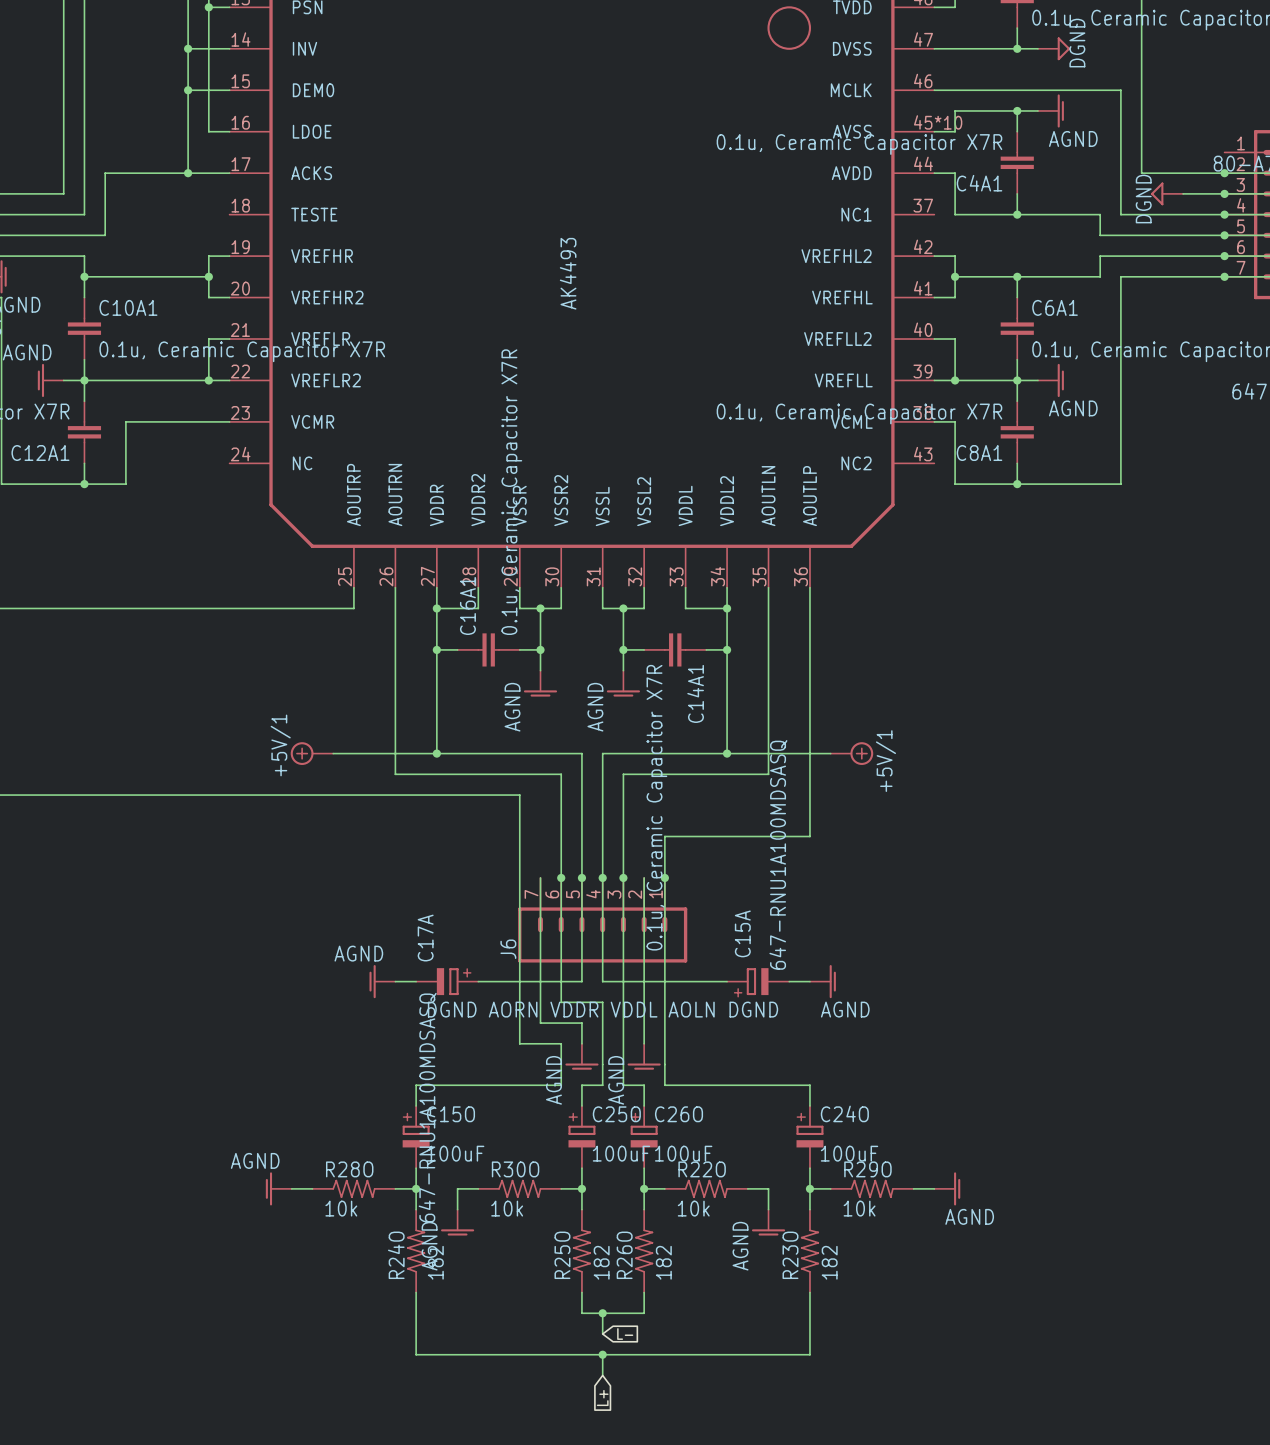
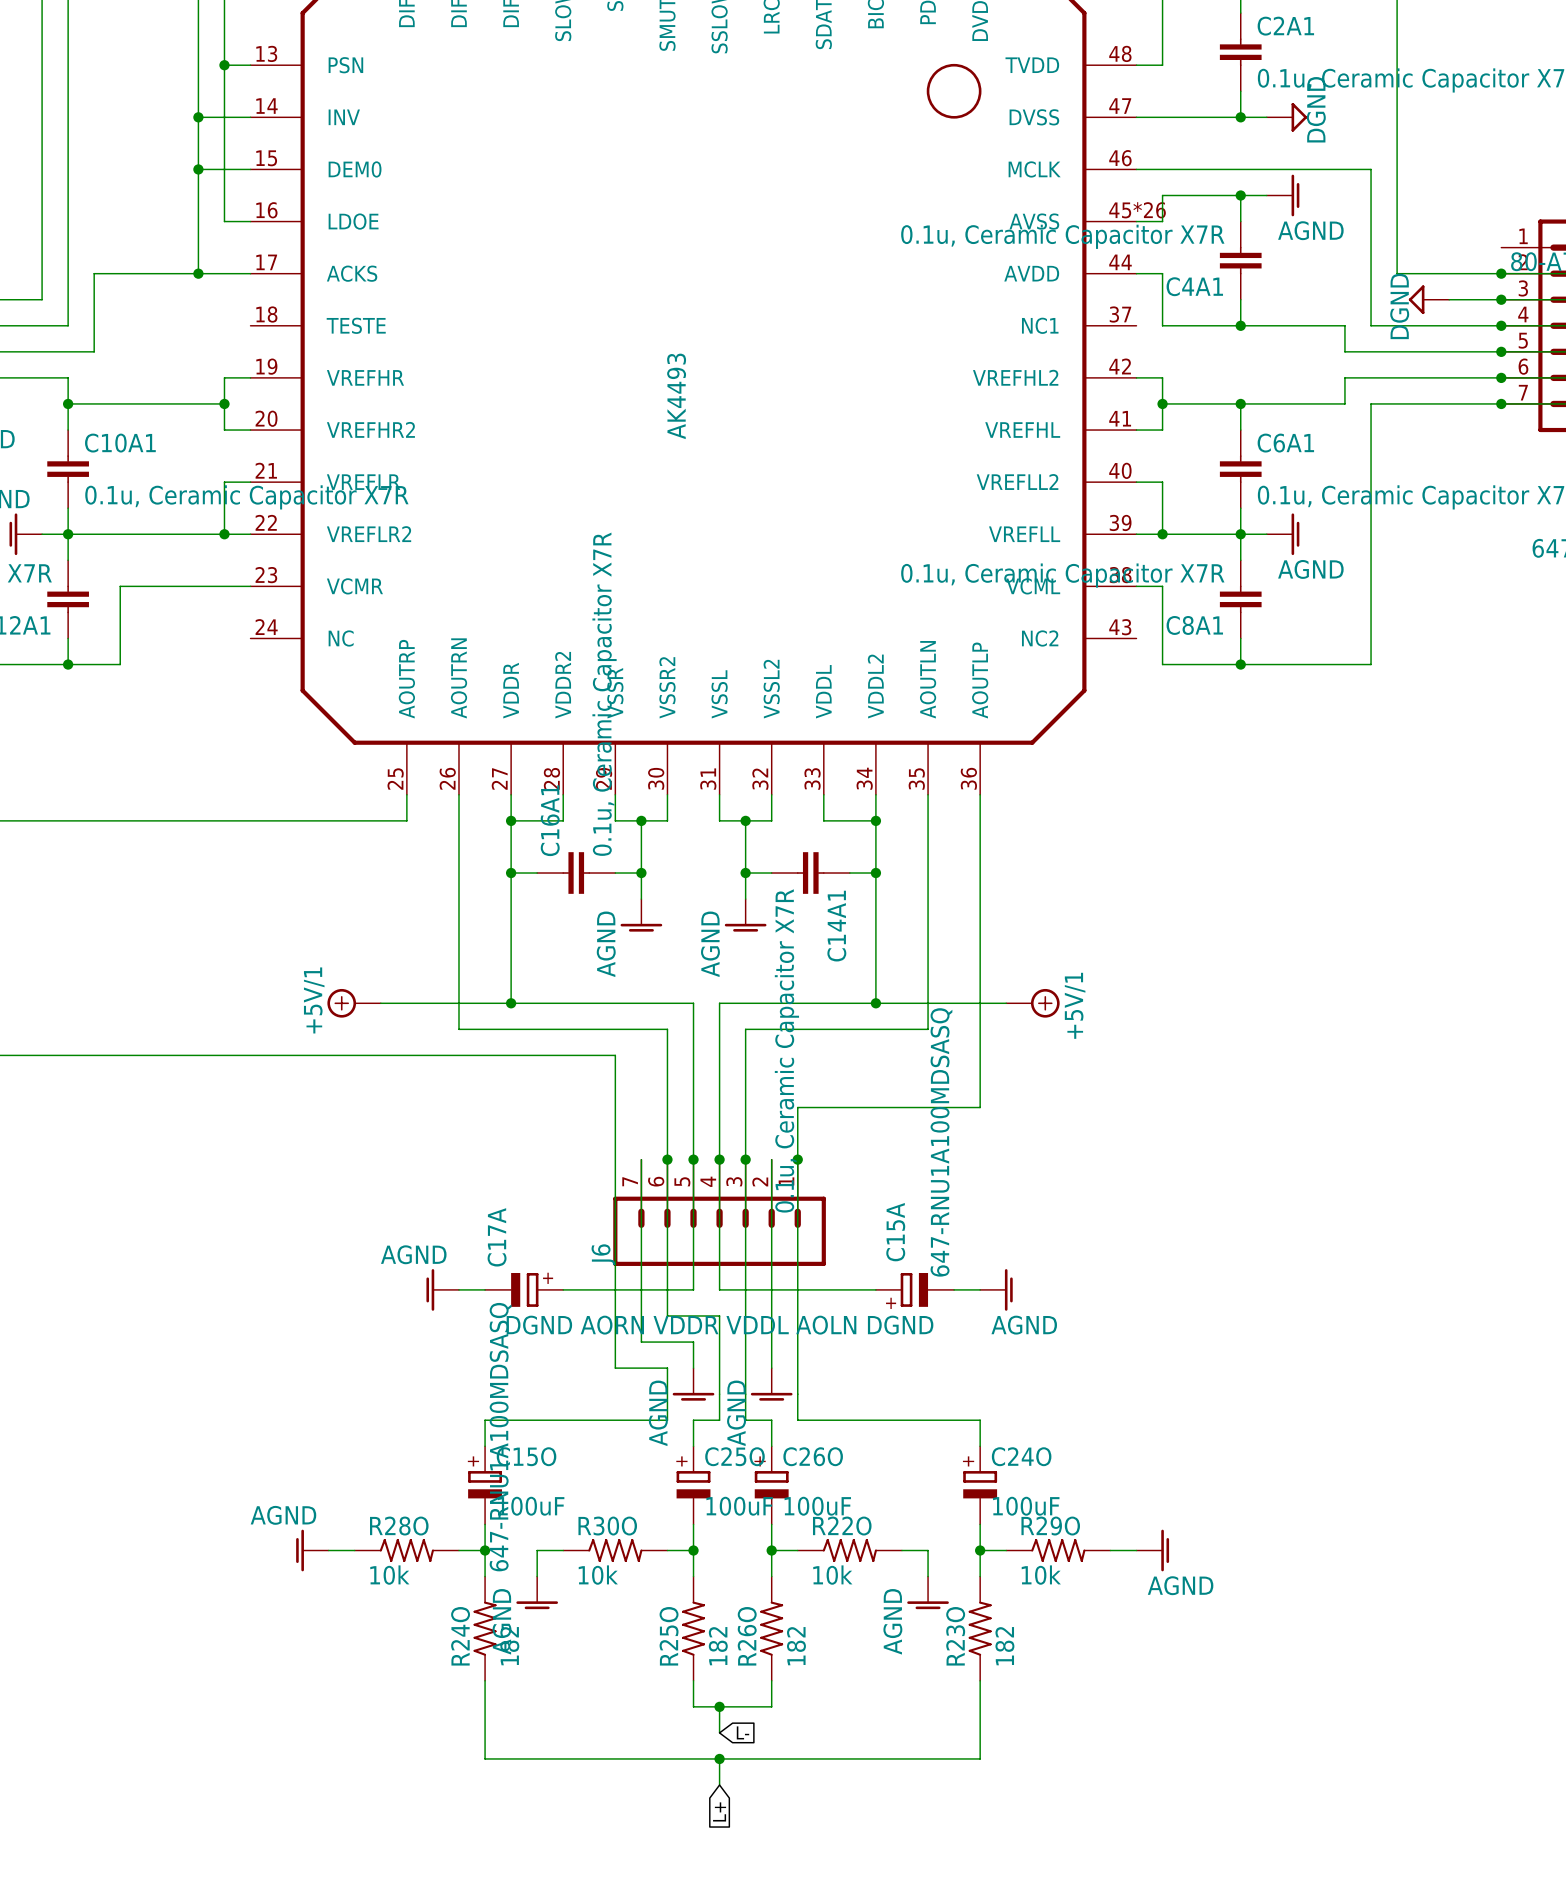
part pin number: 45*10 (938, 122) -> 45*26 (1137, 210)

